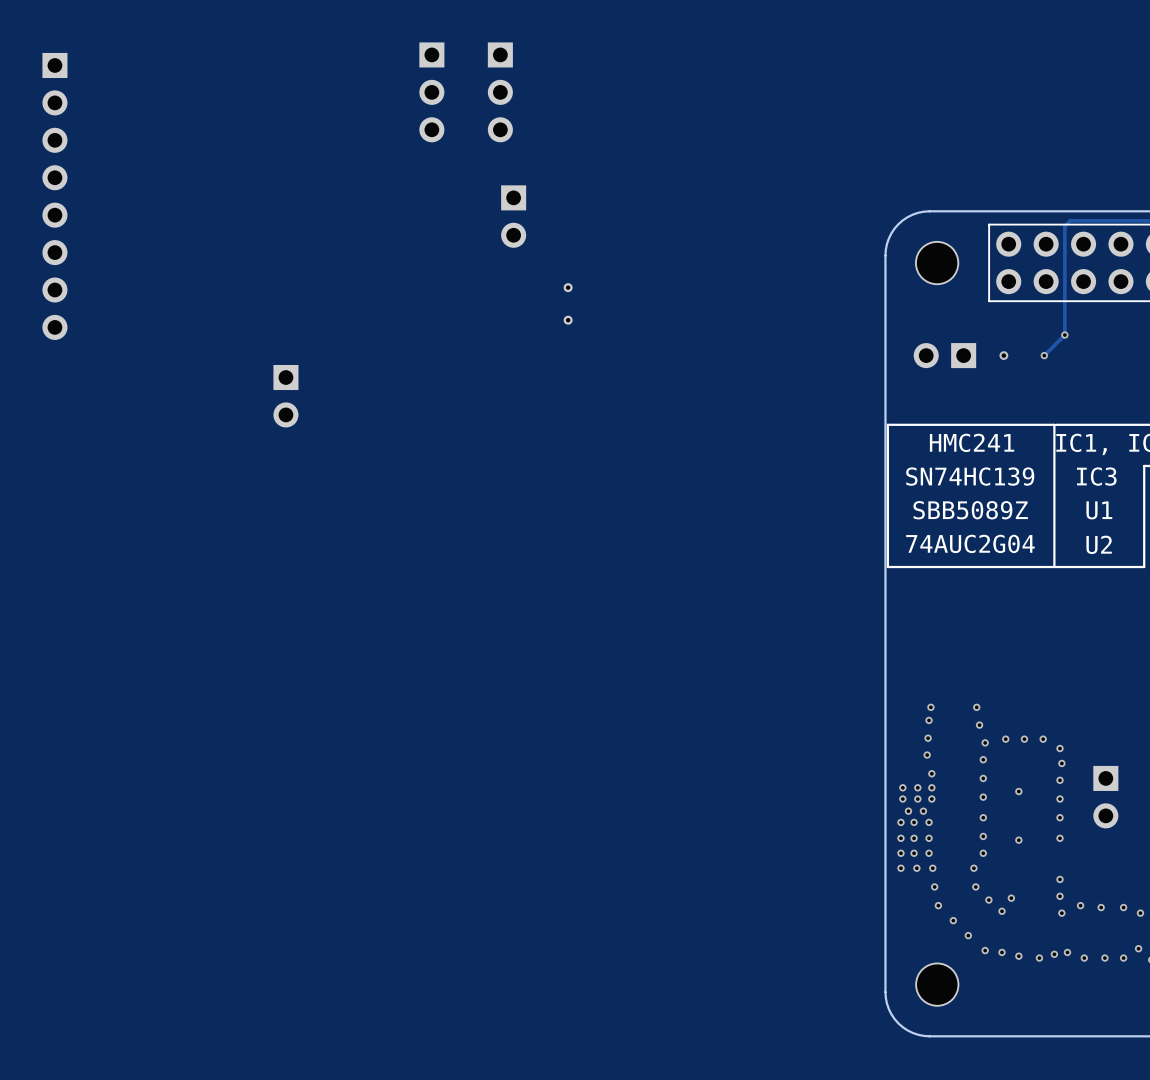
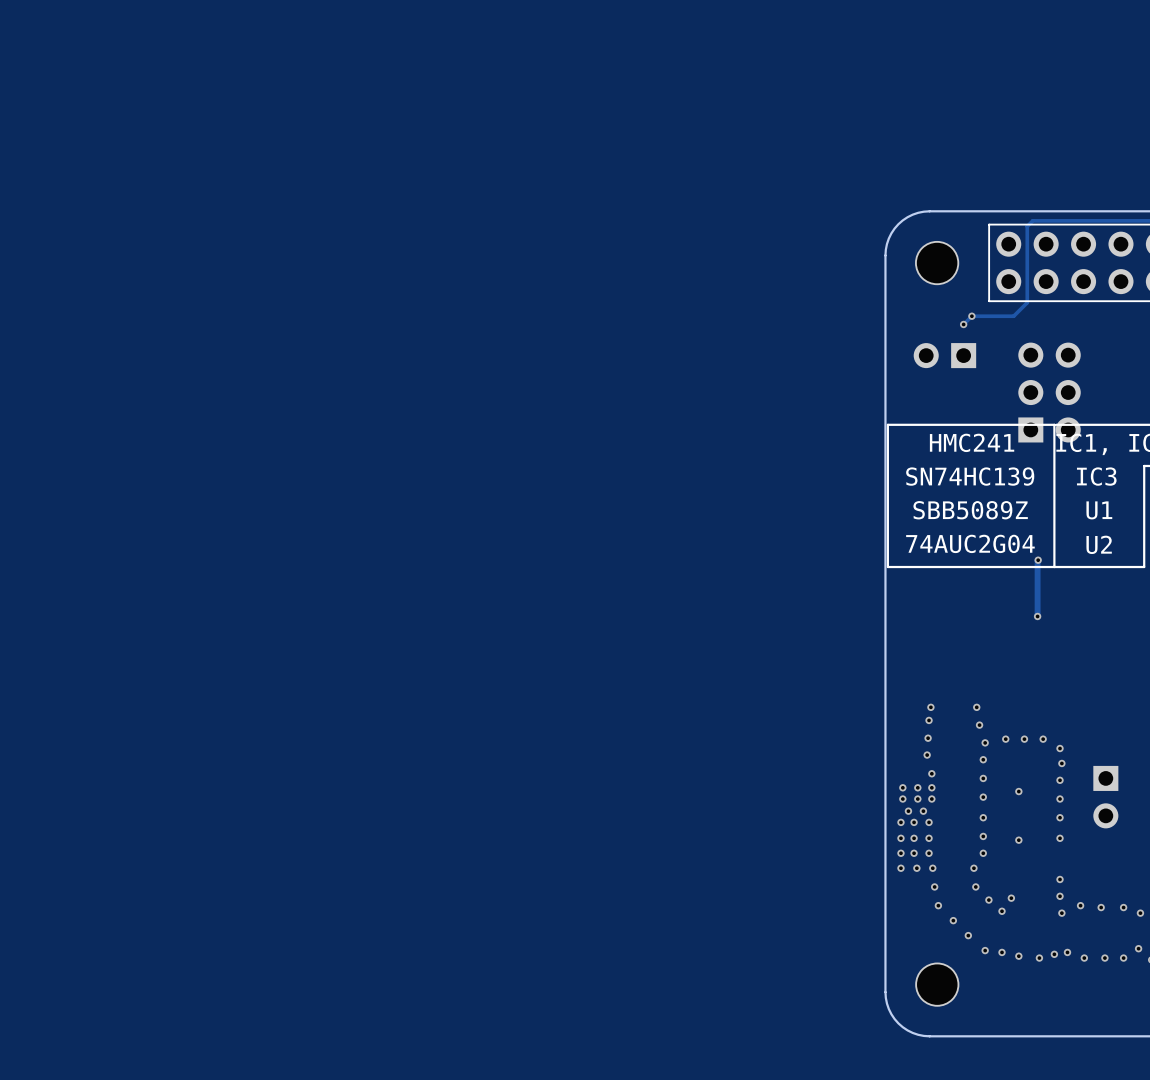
part: (431, 92) -> none
part: (500, 92) -> none
part: (54, 196) -> none
part: (513, 216) -> none
track: (1070, 220) (1064, 226) (1064, 335) (1044, 355) -> (1070, 220) (1032, 220) (1027, 226) (1027, 302) (1013, 316) (971, 316) (963, 324)
part: (568, 303) -> none
via: none -> (971, 316)
via: none -> (963, 324)
via: (1064, 335) -> none
via: (1003, 355) -> none
via: (1044, 355) -> none
part: none -> (1049, 392)
part: (285, 396) -> none
track: none -> (1038, 560) (1037, 616)
via: none -> (1038, 560)
via: none -> (1037, 616)

